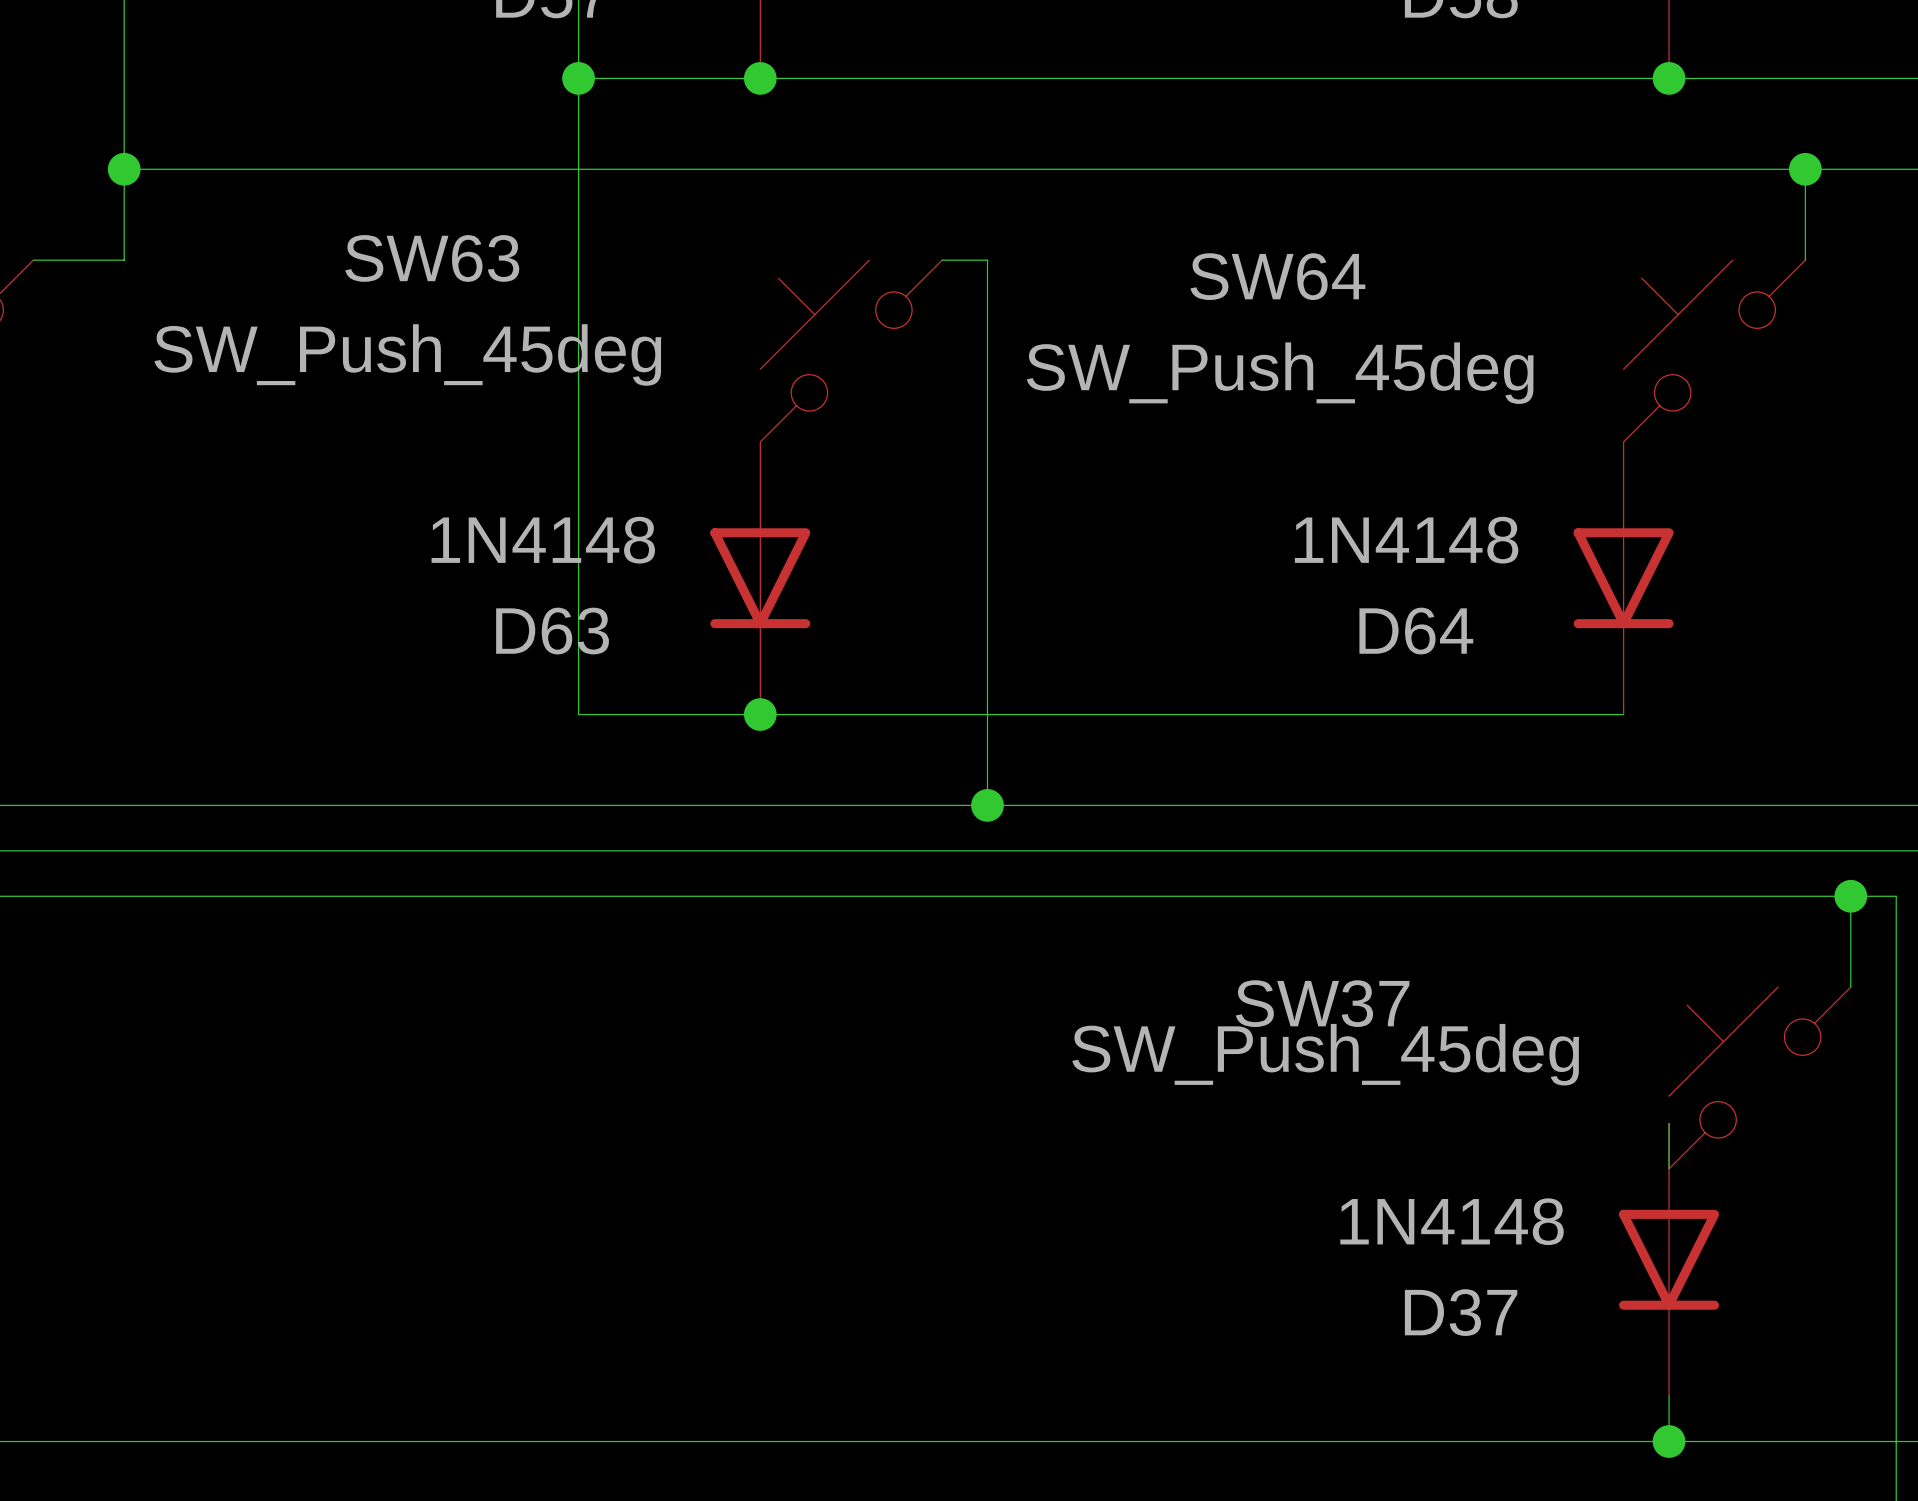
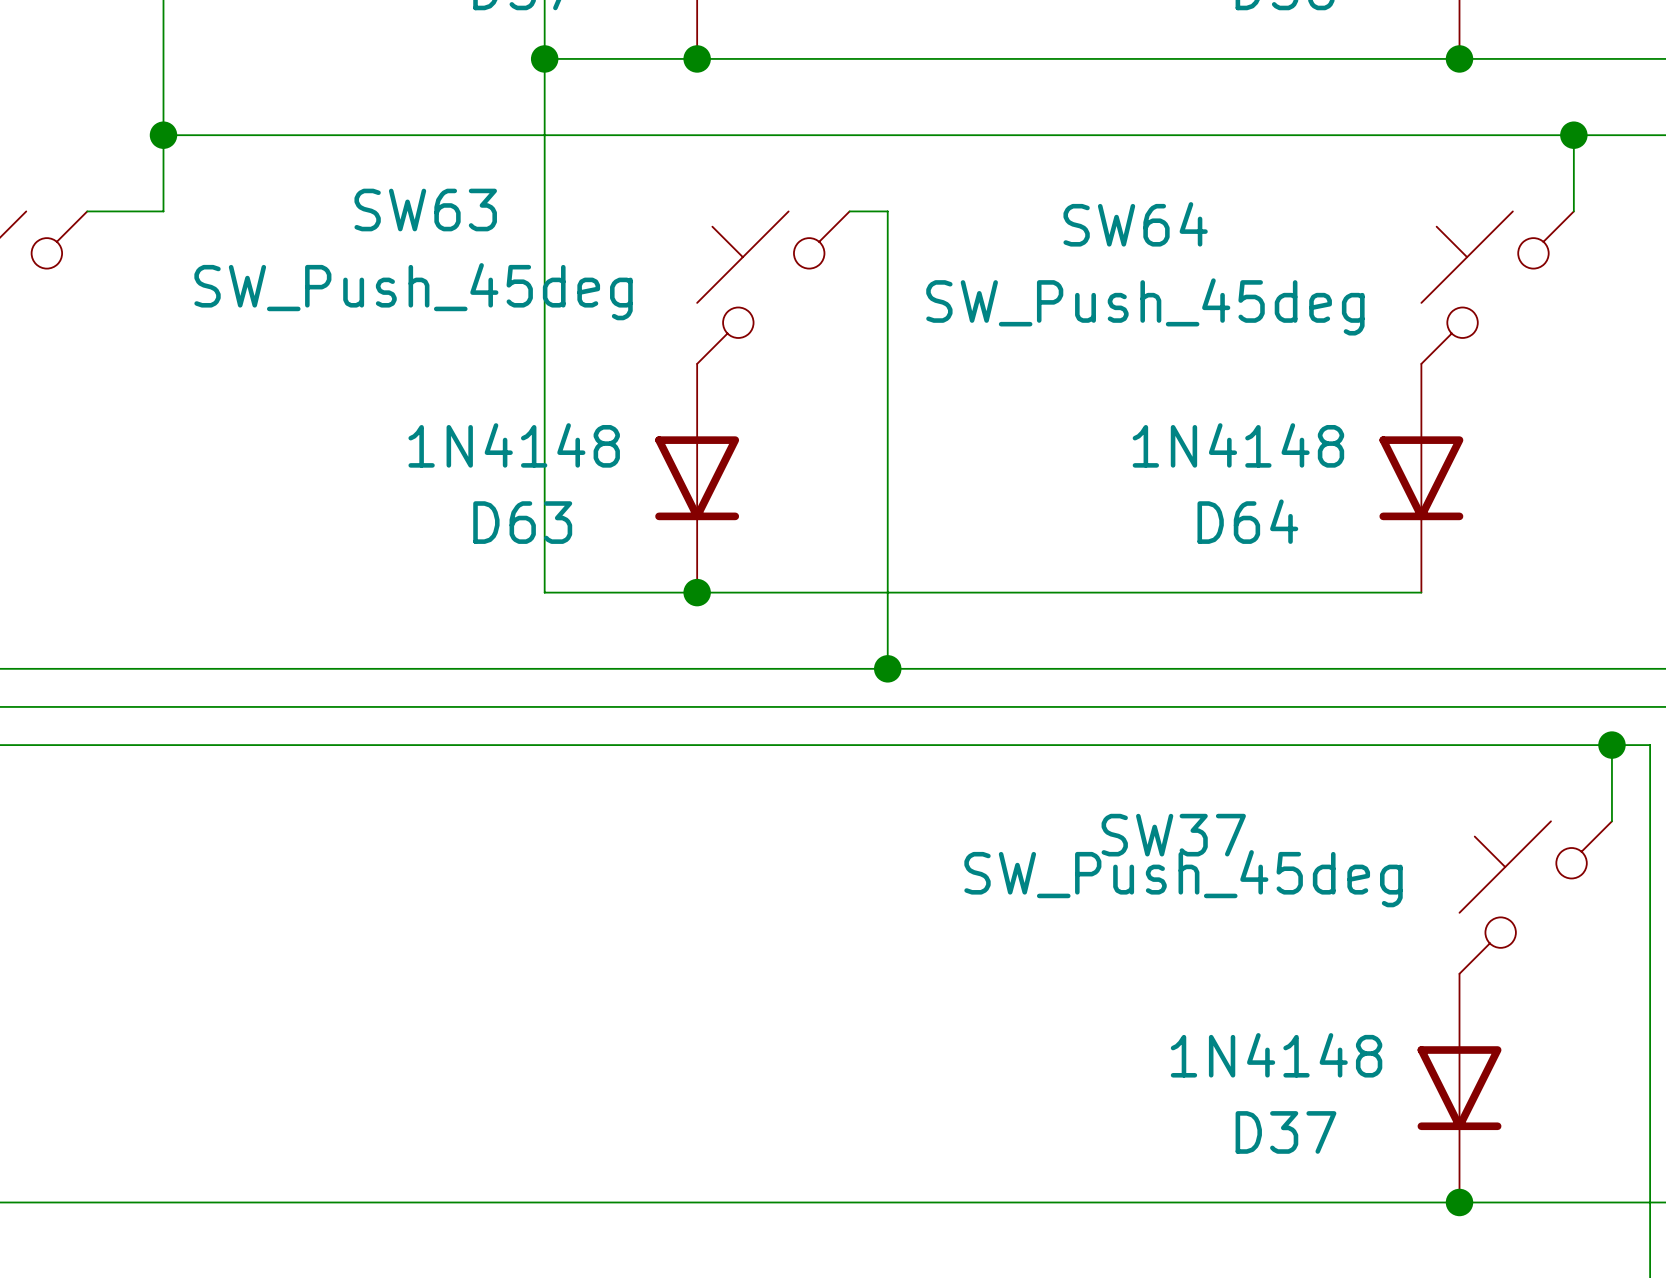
wire: (1669, 1123) (1669, 1168) -> none
D37 position: (1669, 1259) -> (1459, 1088)

